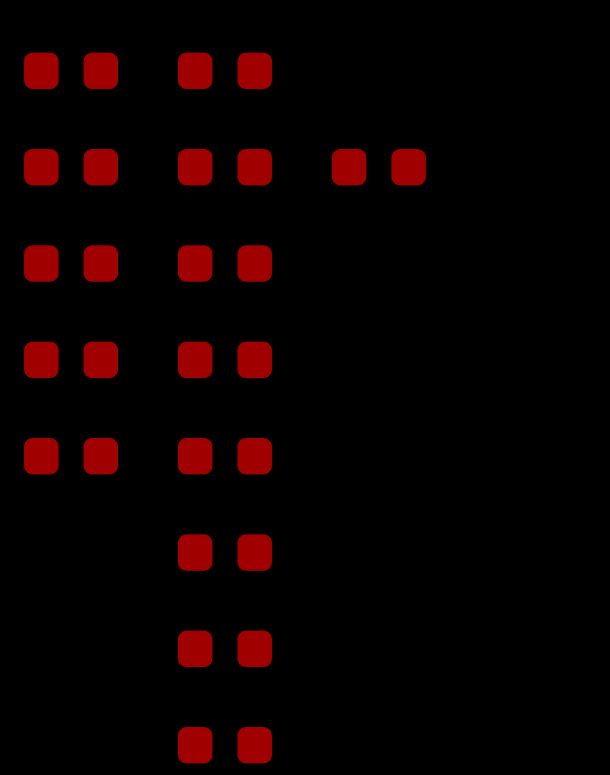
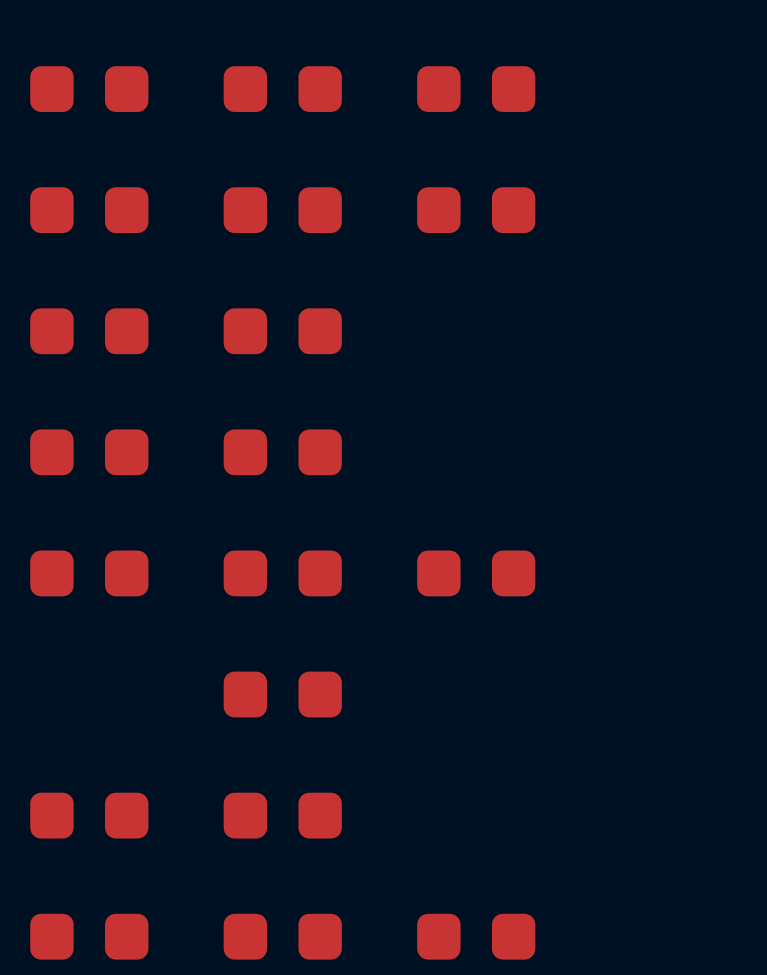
part: none -> (476, 89)
part: none -> (476, 573)
part: none -> (89, 815)
part: none -> (89, 936)
part: none -> (476, 936)

